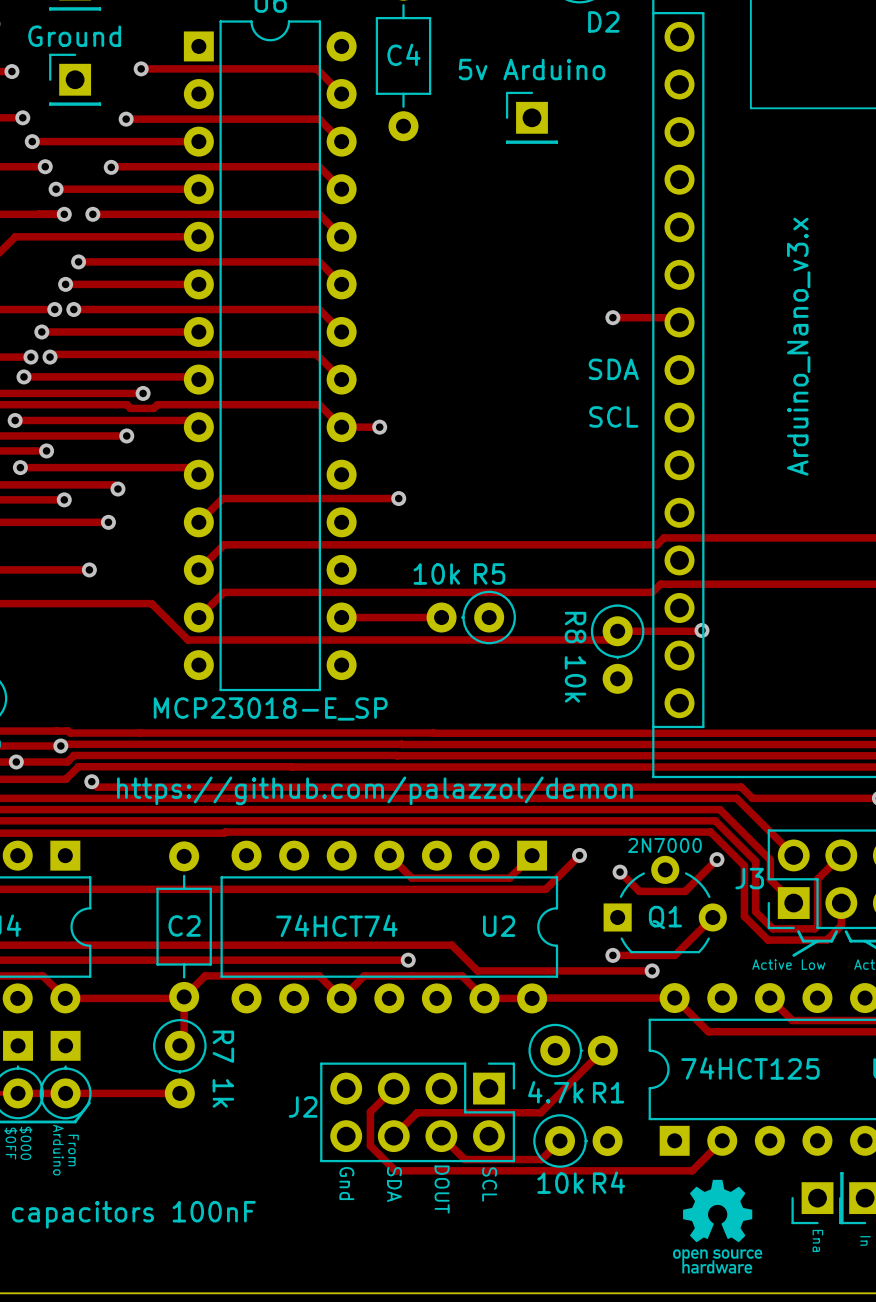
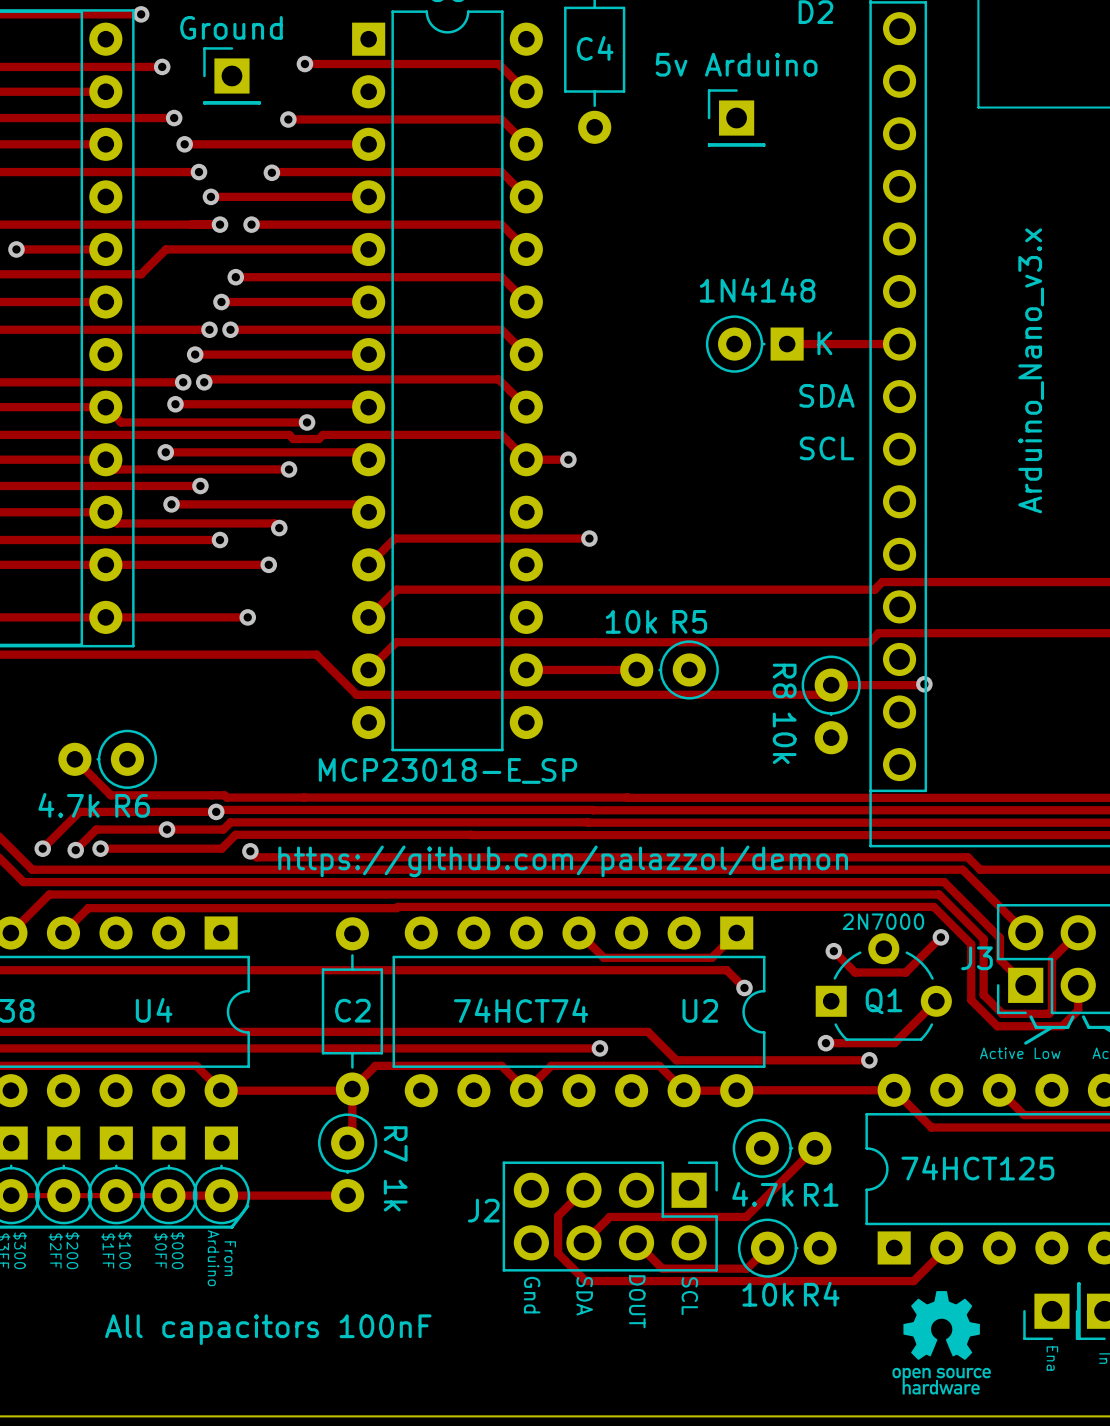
text: none -> 1N4148 (757, 290)
track: (612, 317) (674, 317) (679, 322) -> (787, 344) (899, 344)
via: (612, 317) -> none
part: none -> (754, 344)
track: (579, 855) (545, 889) (523, 889) -> (744, 987) (726, 970)
via position: (579, 855) -> (744, 987)

